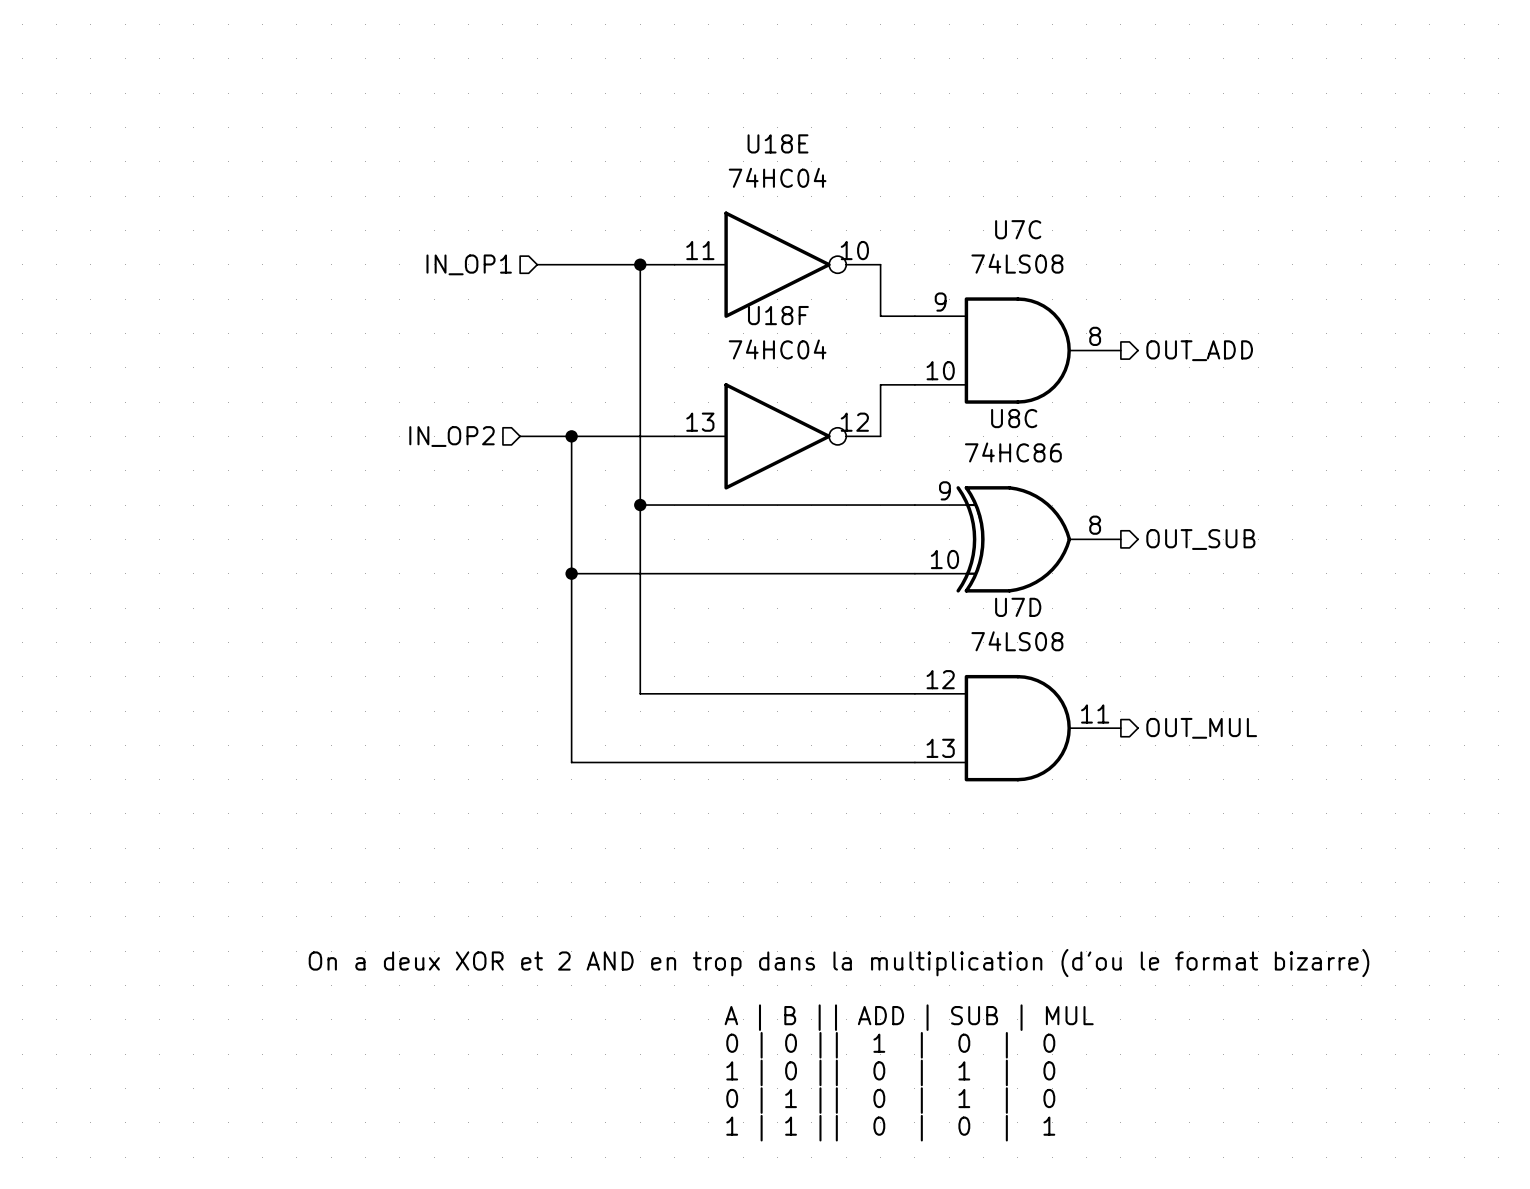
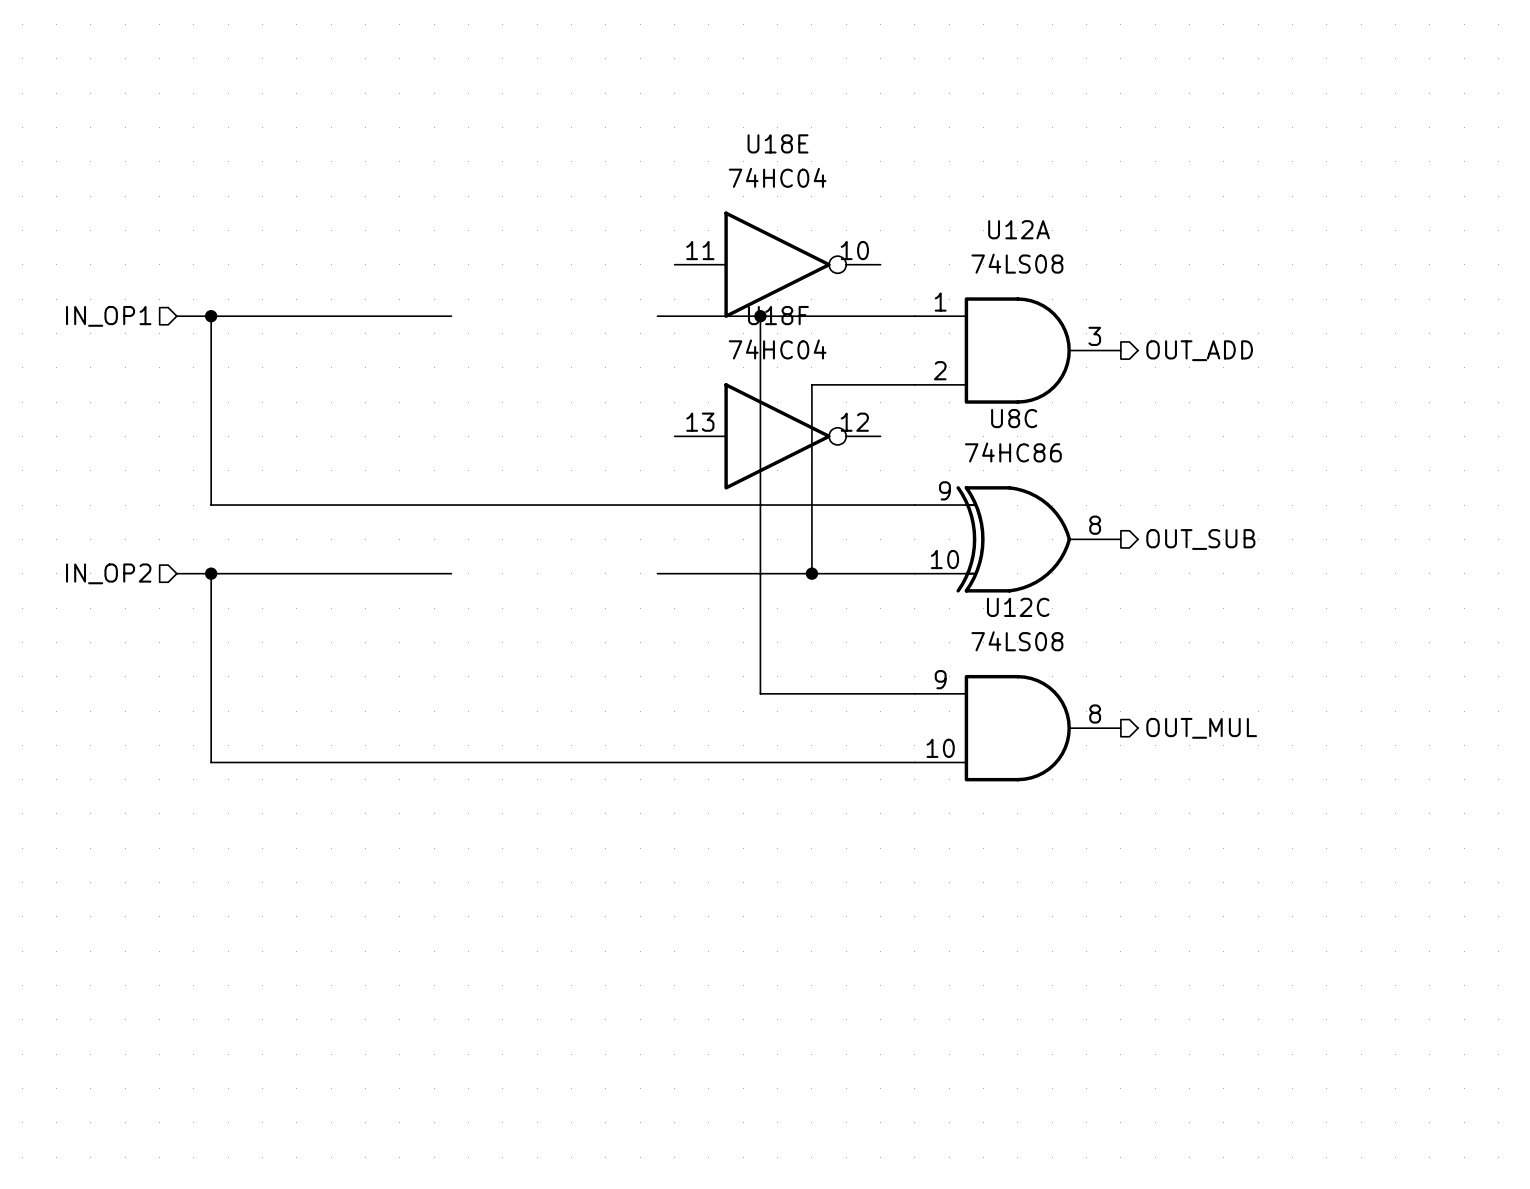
U7C name: U7C (1018, 229) -> U12A (1019, 229)
hierarchical label: IN_OP1 (469, 264) -> none
wire: (537, 264) (674, 264) -> none
wire: (640, 264) (640, 693) (760, 693) -> (760, 316) (760, 693)
junction: (640, 264) -> none
wire: (880, 264) (880, 316) -> (657, 316) (880, 316)
U7C pin number: 9 (940, 302) -> 1 (940, 302)
hierarchical label: none -> IN_OP1 (108, 316)
wire: none -> (176, 316) (451, 316)
wire: none -> (211, 316) (211, 505) (640, 505)
junction: none -> (211, 316)
junction: none -> (760, 316)
U7C pin number: 8 (1095, 336) -> 3 (1094, 336)
U7C pin number: 10 (940, 370) -> 2 (940, 370)
wire: (880, 384) (880, 436) -> (880, 384) (811, 384) (811, 573)
hierarchical label: IN_OP2 (452, 436) -> none
wire: (520, 436) (674, 436) -> none
wire: (571, 436) (571, 762) -> (211, 573) (211, 762) (571, 762)
junction: (571, 436) -> none
junction: (640, 505) -> none
hierarchical label: none -> IN_OP2 (108, 573)
wire: none -> (176, 573) (451, 573)
junction: none -> (211, 573)
wire: (571, 573) (657, 573) -> none
junction: (571, 573) -> none
junction: none -> (811, 573)
U7D name: U7D (1018, 607) -> U12C (1018, 607)
U7D pin number: 12 (940, 679) -> 9 (940, 679)
U7D pin number: 11 (1095, 714) -> 8 (1095, 714)
U7D pin number: 13 (940, 748) -> 10 (940, 748)
text: On a deux XOR et 2 AND en trop dans la multiplication (d'ou le format bizarre) (838, 963) -> none
text: A | B || ADD | SUB | MUL (909, 1017) -> none
text: 0 | 0 || 1 | 0 | 0 (890, 1045) -> none
text: 1 | 0 || 0 | 1 | 0 (890, 1072) -> none
text: 0 | 1 || 0 | 1 | 0 (890, 1100) -> none
text: 1 | 1 || 0 | 0 | 1 (890, 1128) -> none

